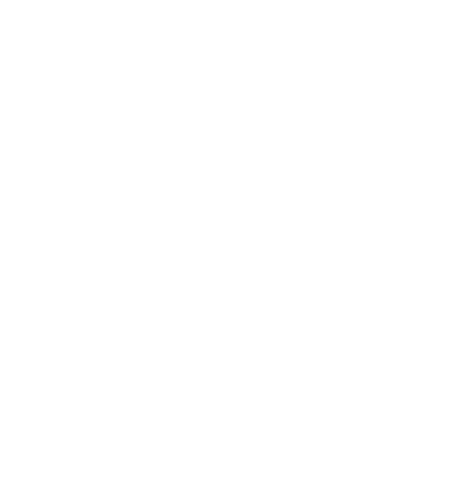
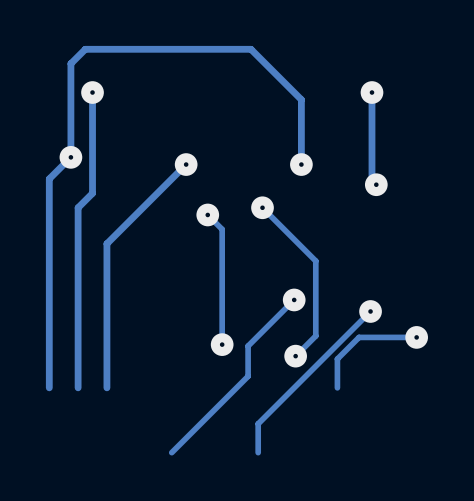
track: none -> (92, 92) (92, 193) (78, 207) (78, 387)
via: none -> (92, 92)
track: none -> (371, 92) (371, 180) (376, 184)
via: none -> (371, 92)
via: none -> (70, 157)
track: none -> (186, 164) (106, 243) (106, 387)
via: none -> (186, 164)
track: none -> (301, 164) (301, 99) (250, 49) (85, 49) (70, 63) (70, 157) (49, 178) (49, 387)
via: none -> (301, 164)
via: none -> (376, 184)
track: none -> (262, 207) (315, 261) (315, 335) (295, 356)
via: none -> (262, 207)
track: none -> (207, 214) (222, 229) (222, 344)
via: none -> (207, 214)
track: none -> (294, 299) (248, 346) (248, 376) (171, 452)
via: none -> (294, 299)
track: none -> (370, 311) (258, 423) (258, 452)
via: none -> (370, 311)
track: none -> (416, 337) (359, 337) (337, 359) (337, 387)
via: none -> (416, 337)
via: none -> (222, 344)
via: none -> (295, 356)

